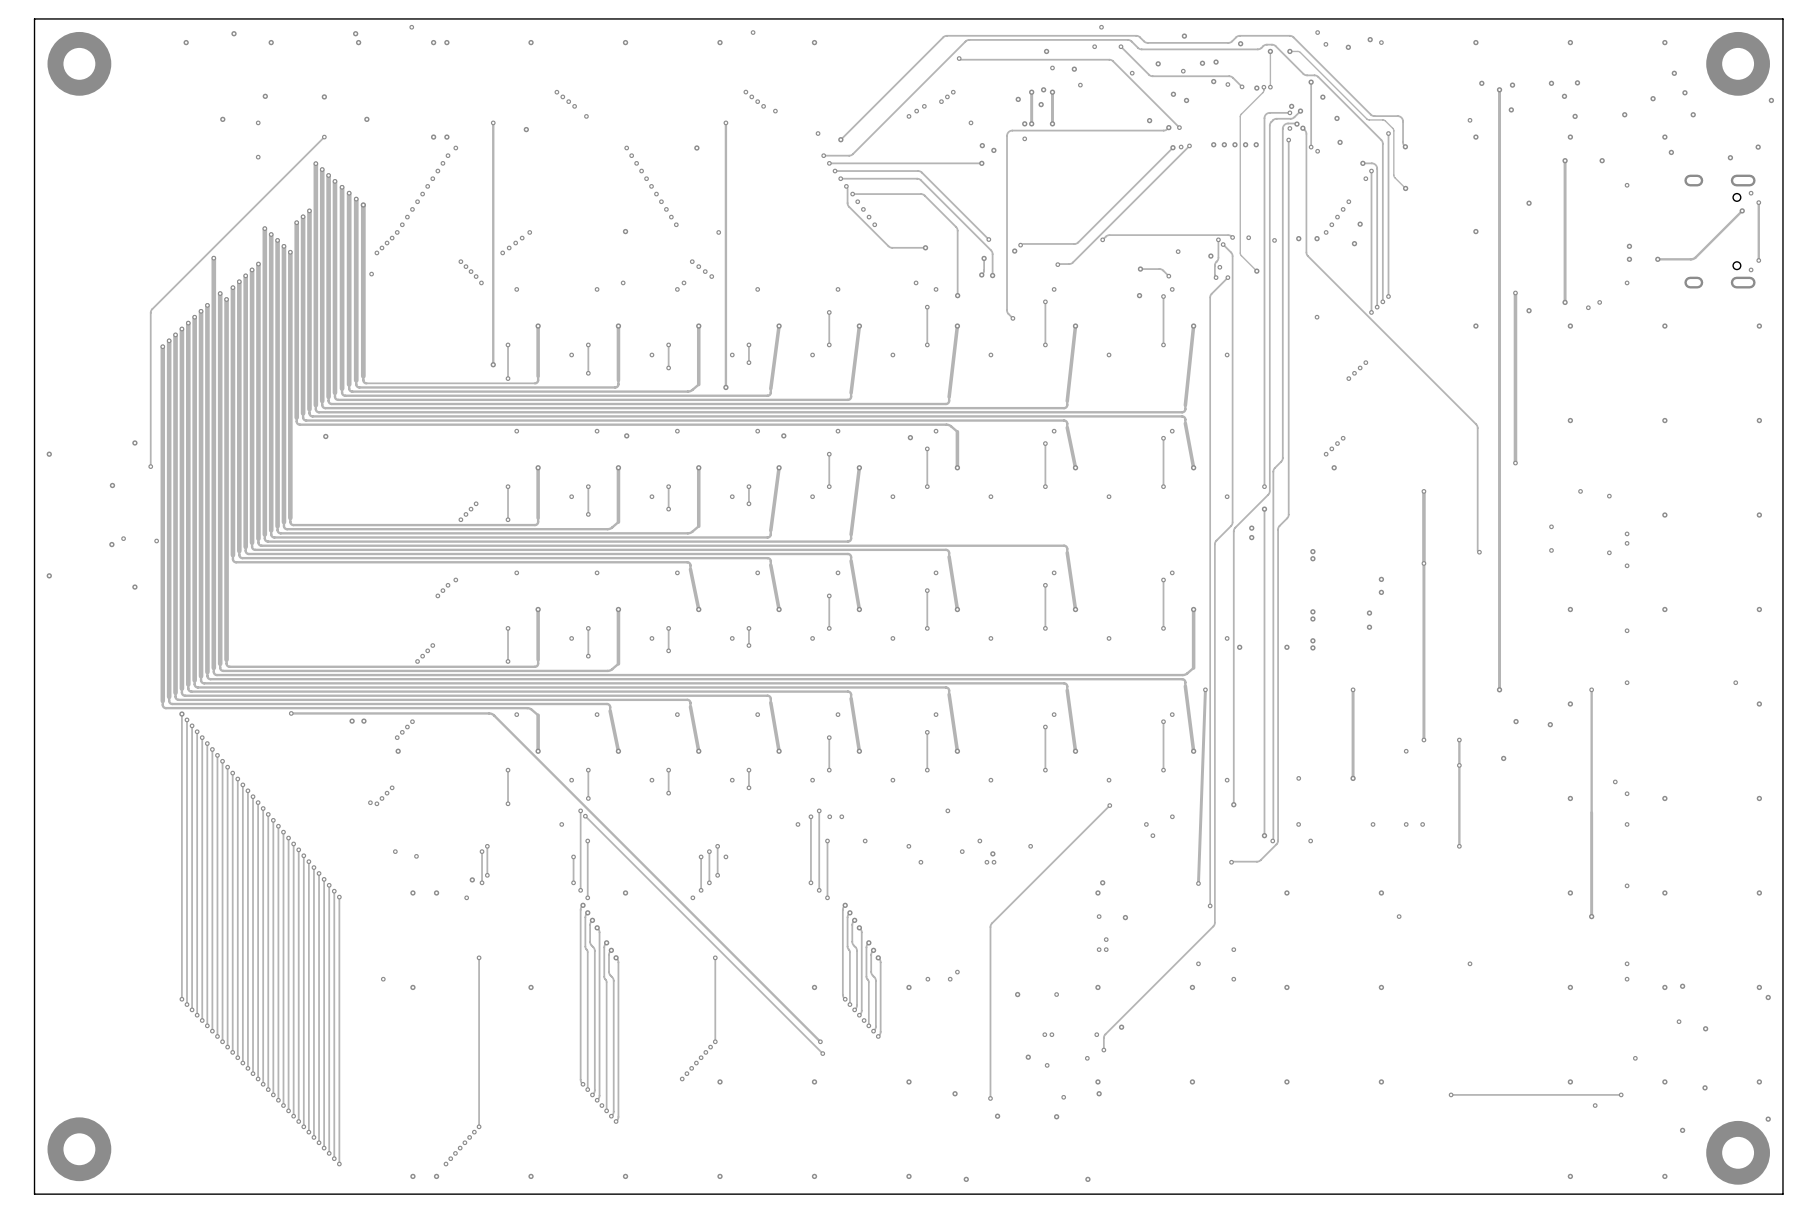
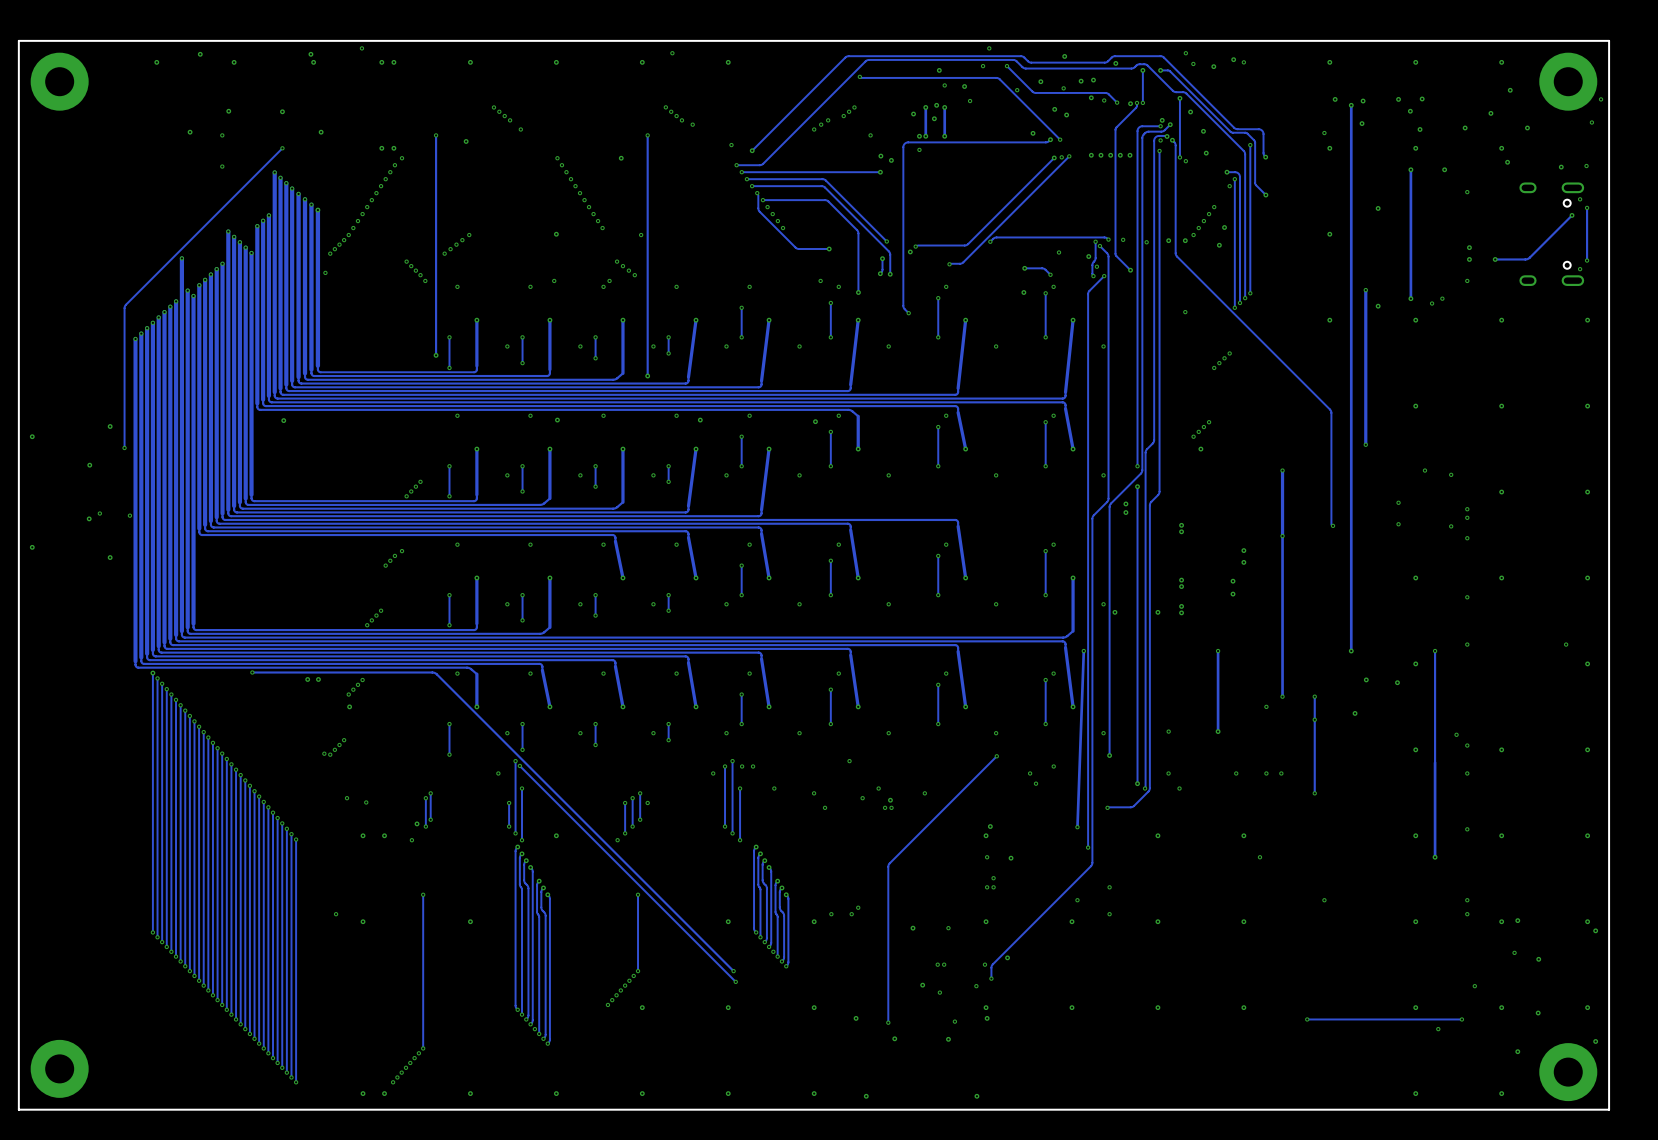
via: none -> (1601, 99)
via: (1684, 92) -> none
via: (1771, 100) -> none
via: none -> (1591, 122)
via: (1758, 147) -> none
via: none -> (1586, 166)

